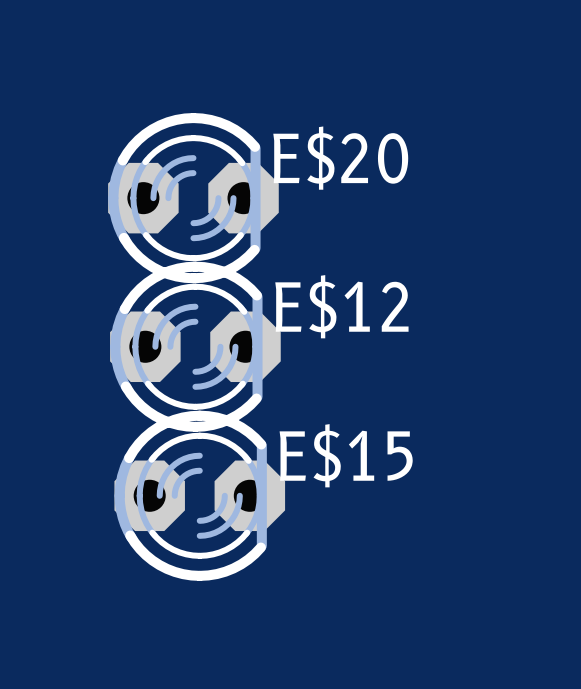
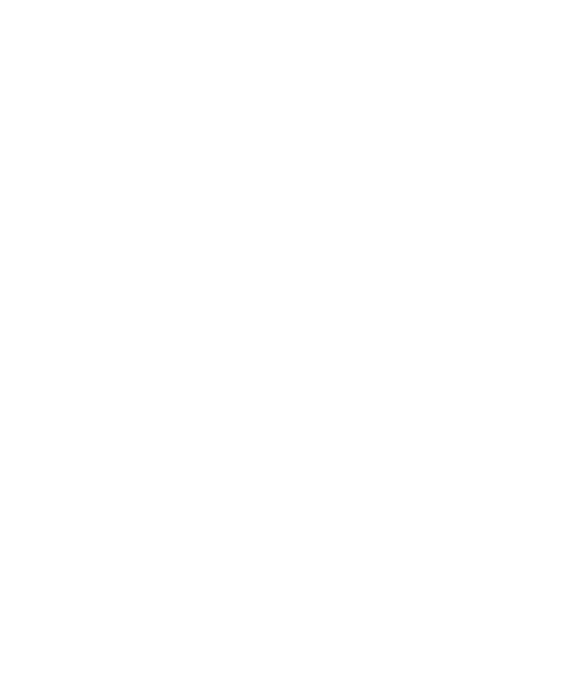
E$20: (193, 198) -> none
E$12: (195, 346) -> none
E$15: (199, 495) -> none

